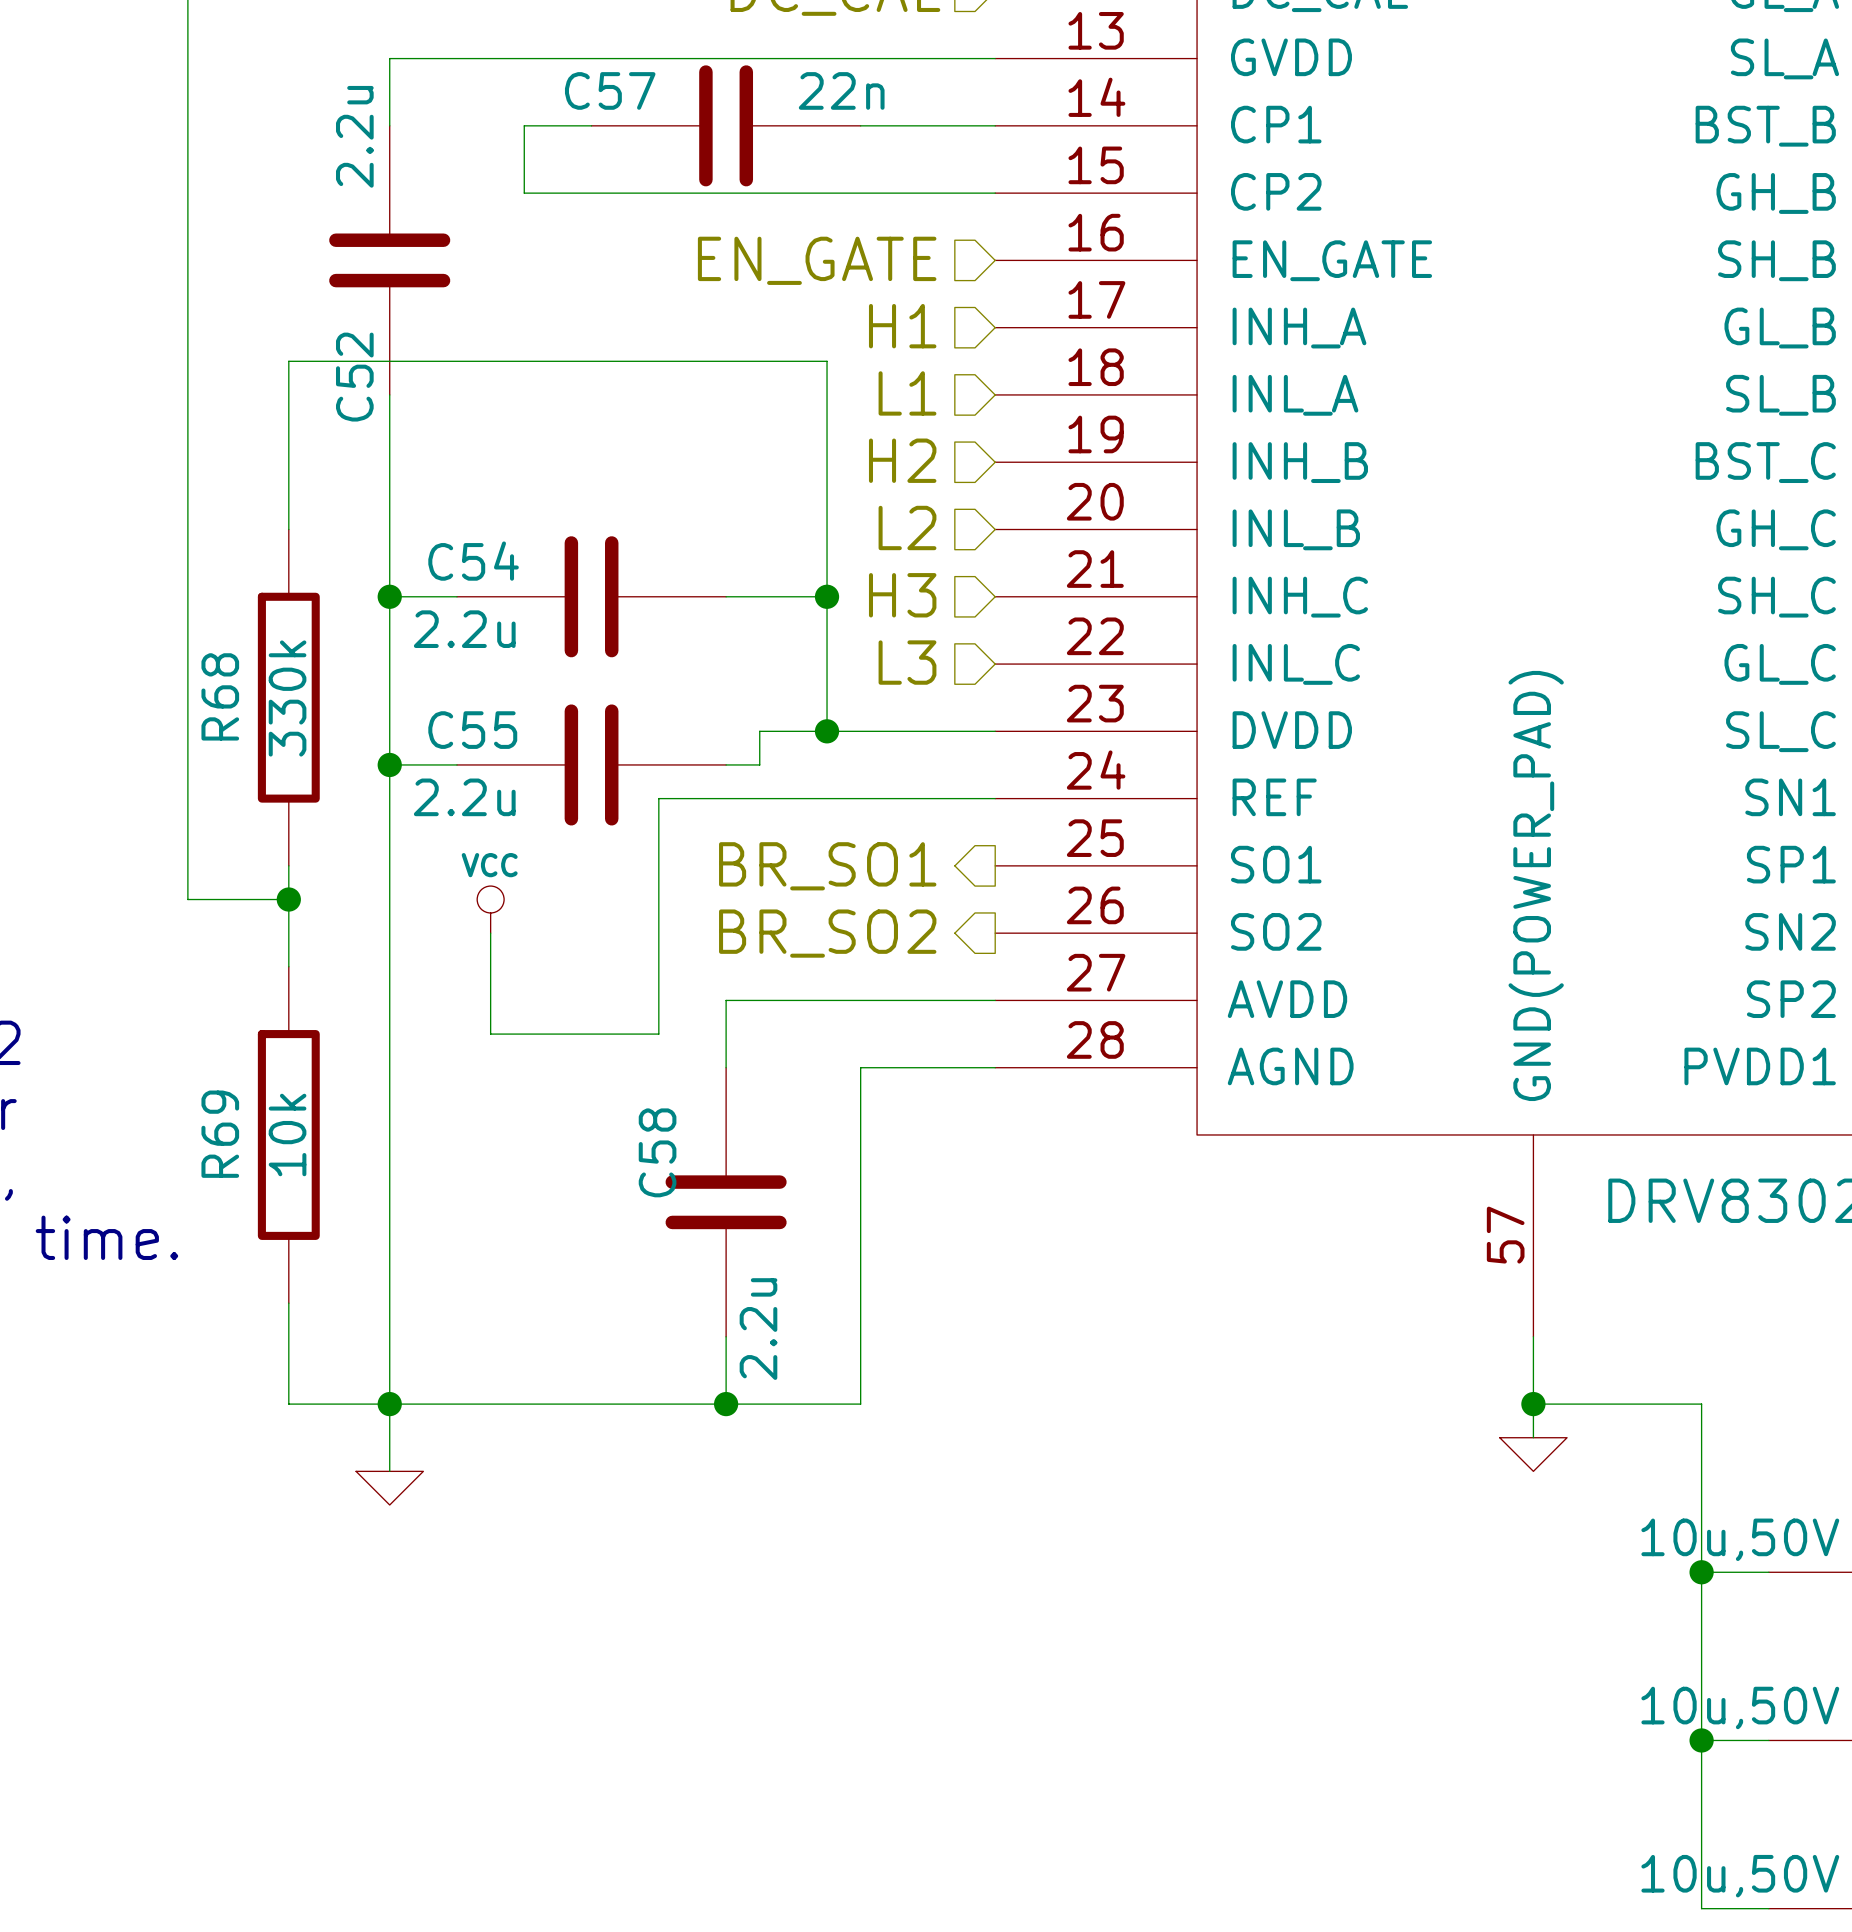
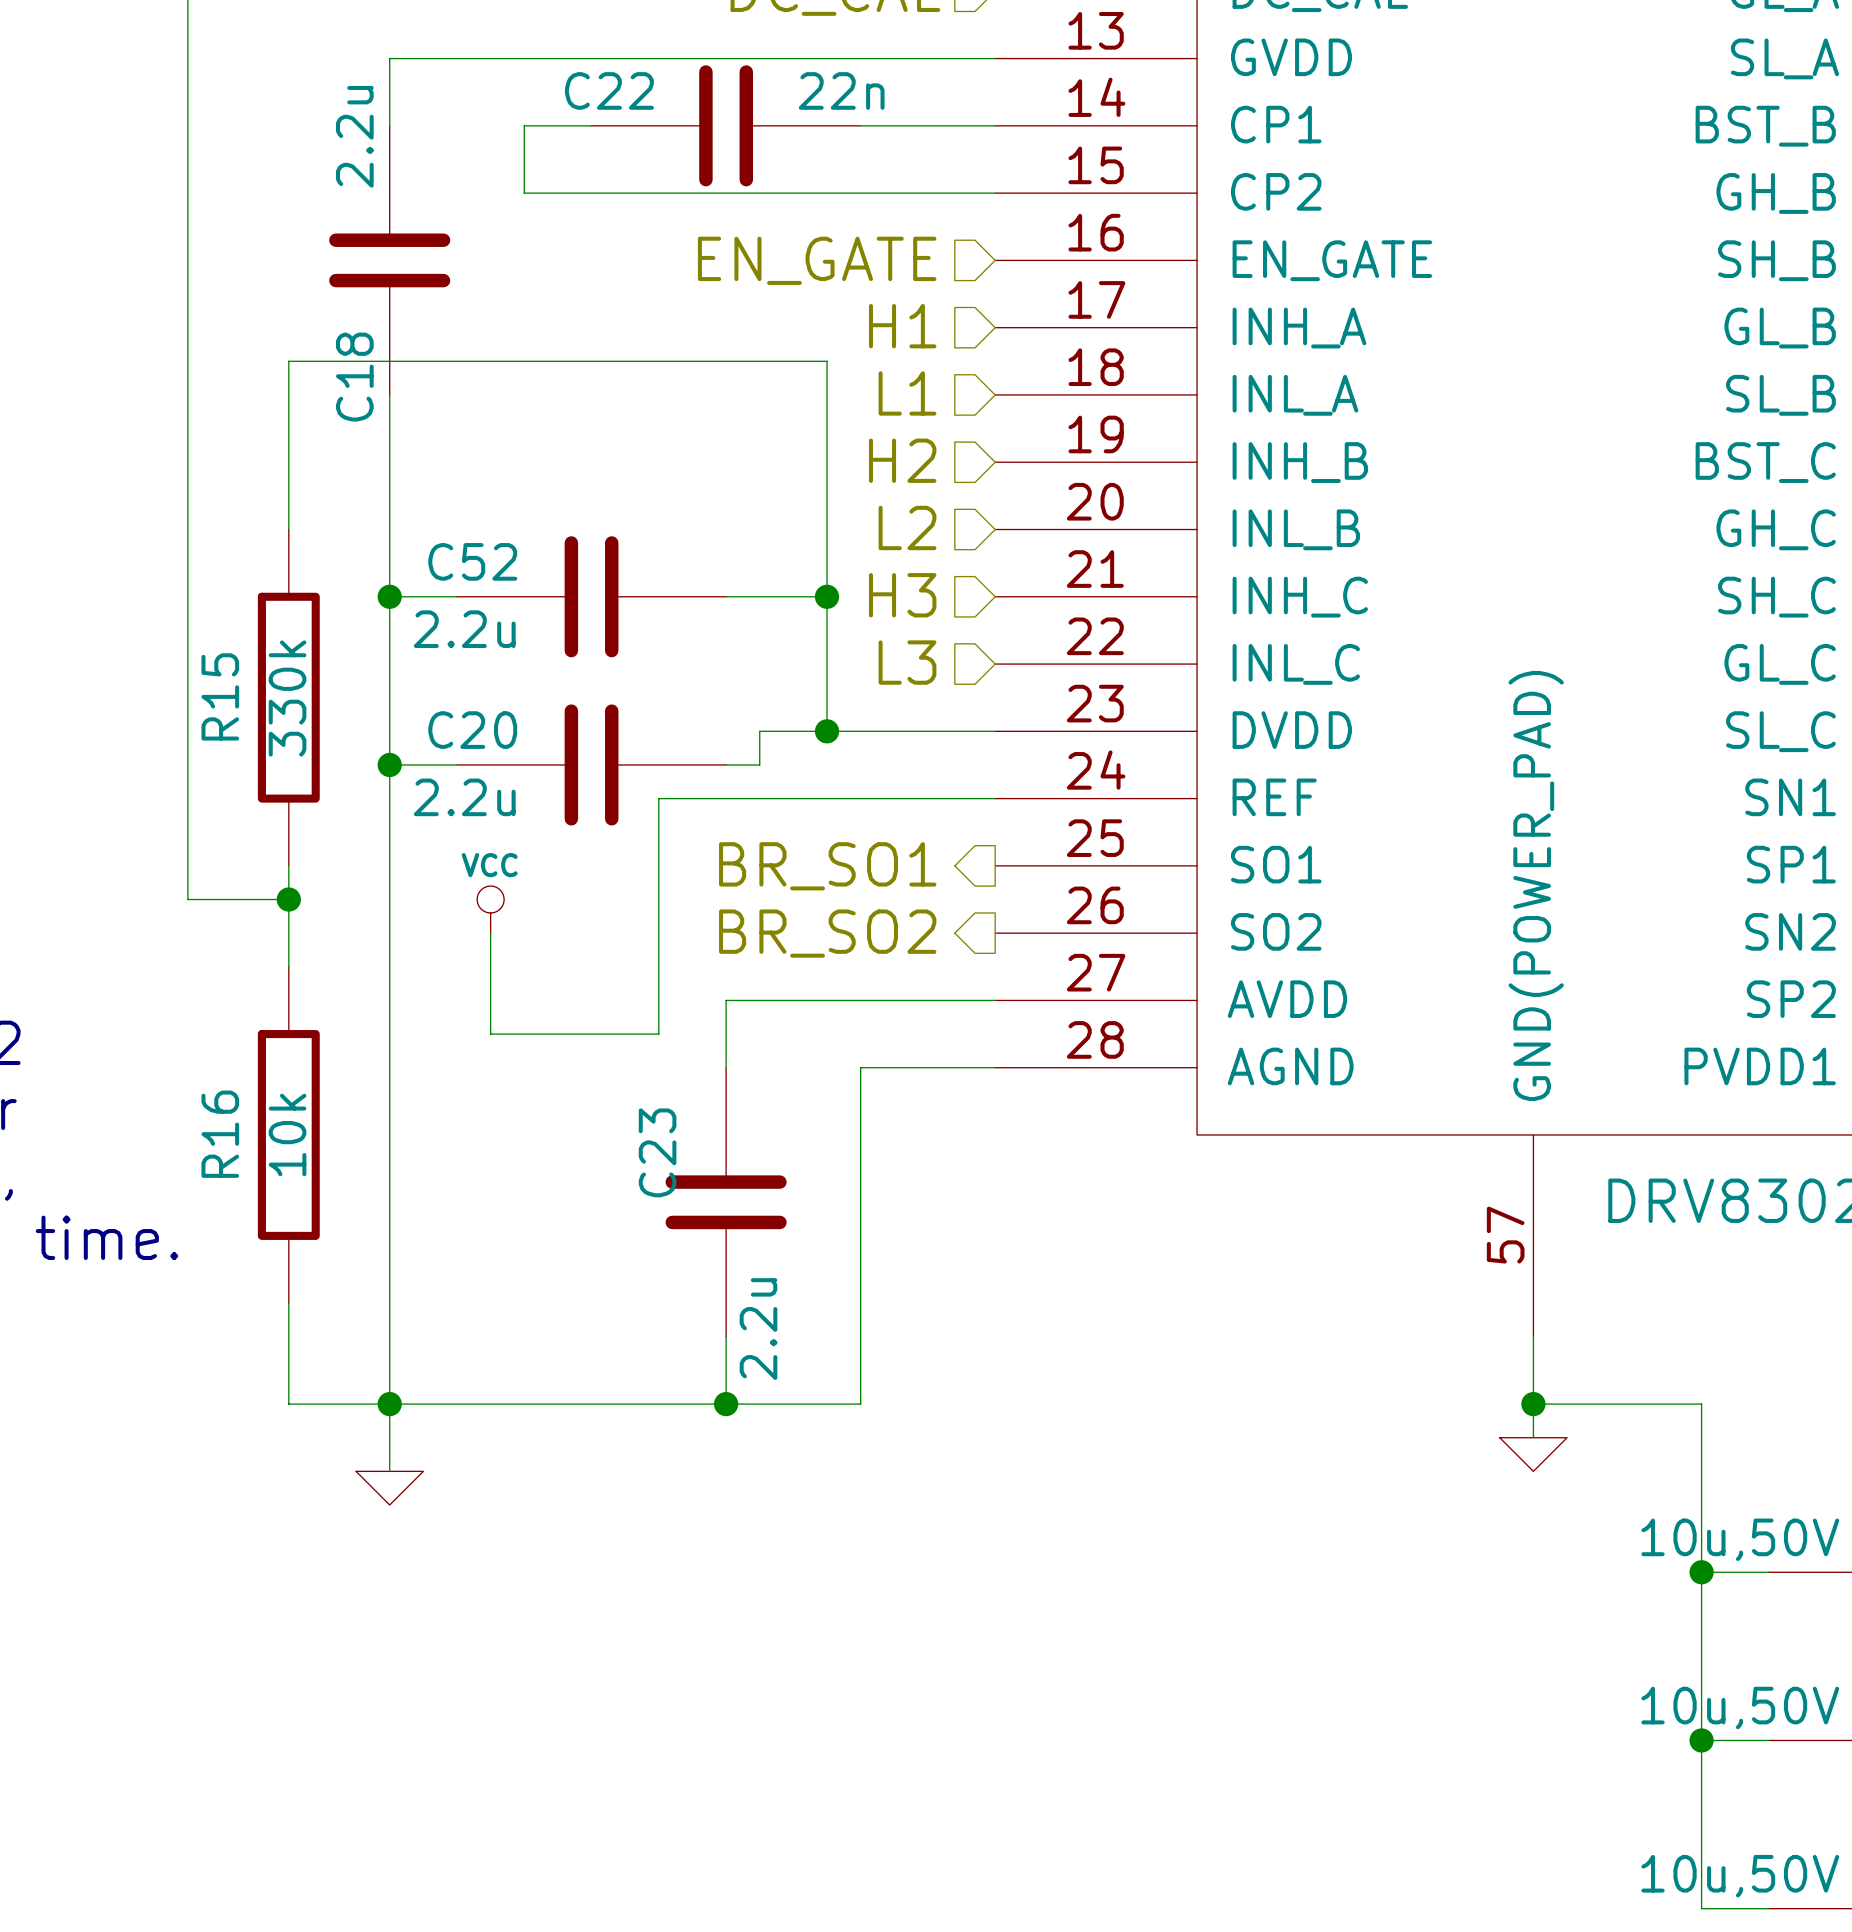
C57 name: C57 (610, 90) -> C22 (609, 90)
C52 name: C52 (354, 377) -> C18 (354, 377)
C54 name: C54 (473, 561) -> C52 (472, 561)
R68 name: R68 (220, 696) -> R15 (220, 696)
C55 name: C55 (472, 730) -> C20 (472, 730)
R69 name: R69 (220, 1134) -> R16 (220, 1134)
C58 name: C58 (657, 1152) -> C23 (657, 1152)

